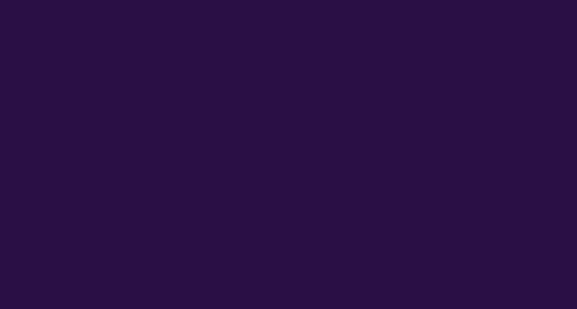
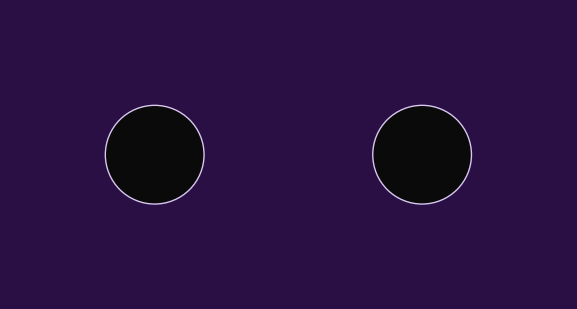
part: none -> (154, 154)
part: none -> (422, 154)

